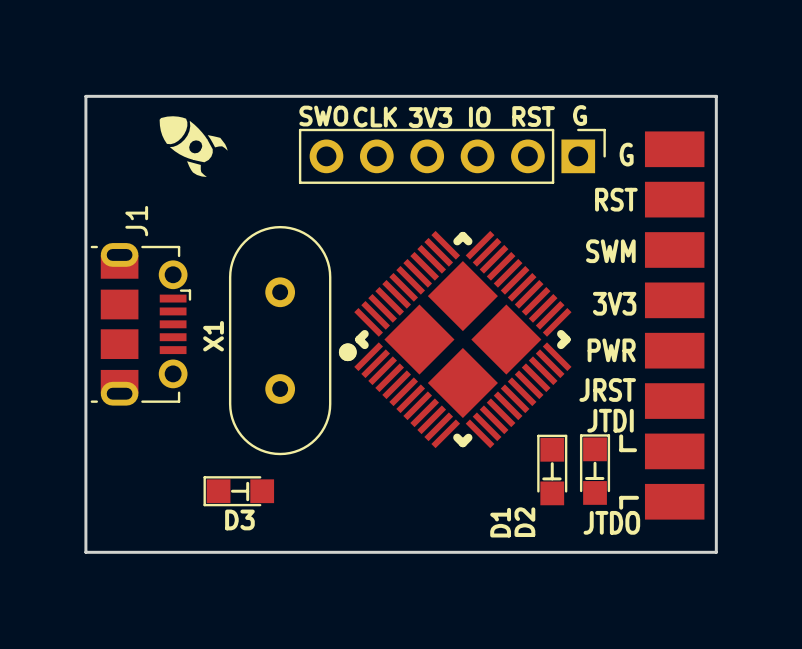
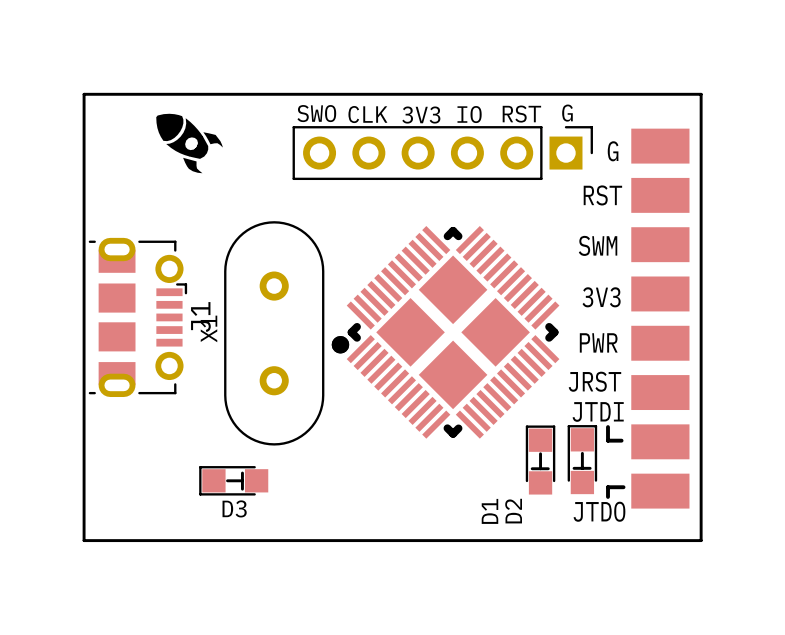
J1 name position: J1 (136, 221) -> J1 (200, 317)

